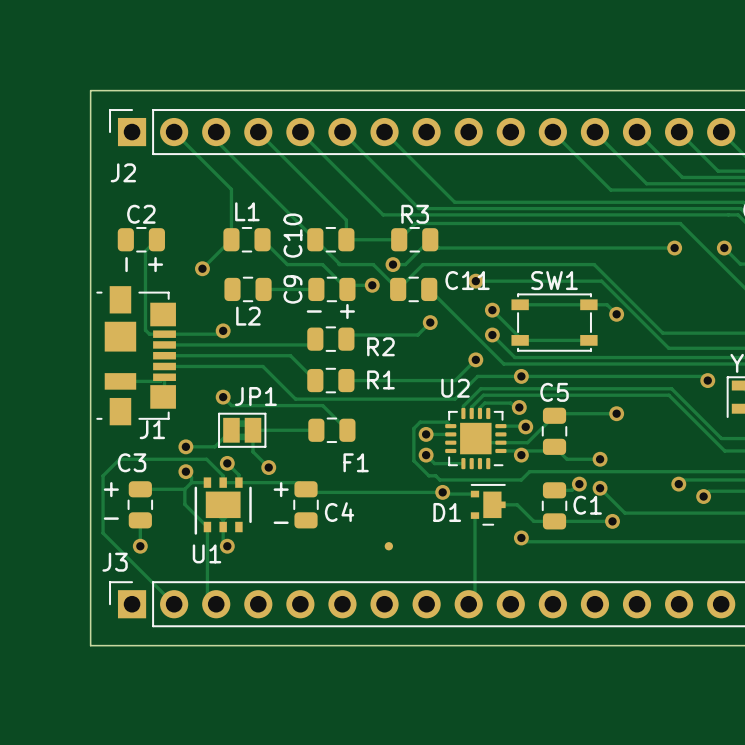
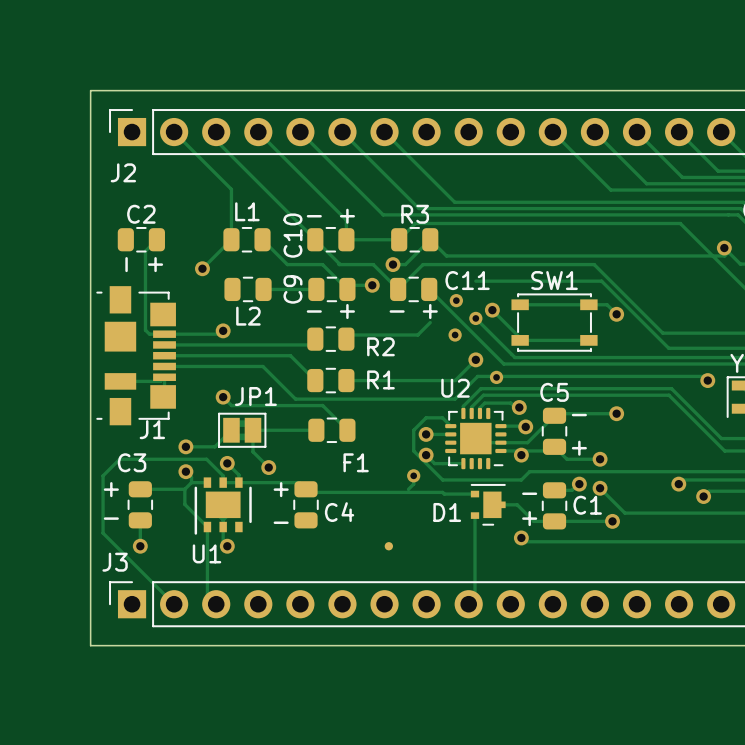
text: none -> - (314, 216)
text: none -> + (347, 216)
track: (438, 248) (674, 248) -> (438, 248) (446, 255) (724, 255) (727, 253)
via: (674, 248) -> none
via: (475, 281) -> none
via: none -> (456, 300)
text: none -> - (397, 311)
text: none -> + (430, 311)
track: none -> (475, 318) (492, 335)
via: none -> (475, 318)
via: (430, 322) -> none
via: none -> (455, 335)
via: (492, 335) -> none
via: (521, 376) -> none
via: none -> (496, 377)
text: none -> - (579, 415)
track: (446, 422) (420, 422) (413, 428) (413, 460) -> (446, 422) (442, 417) (426, 417) (413, 430) (413, 450) (442, 479)
text: none -> + (579, 448)
track: (414, 460) (428, 475) (435, 475) (442, 479) -> none
track: none -> (413, 475) (413, 484) (408, 489)
via: none -> (413, 475)
via: (442, 492) -> none
text: none -> - (529, 493)
text: none -> + (529, 518)

